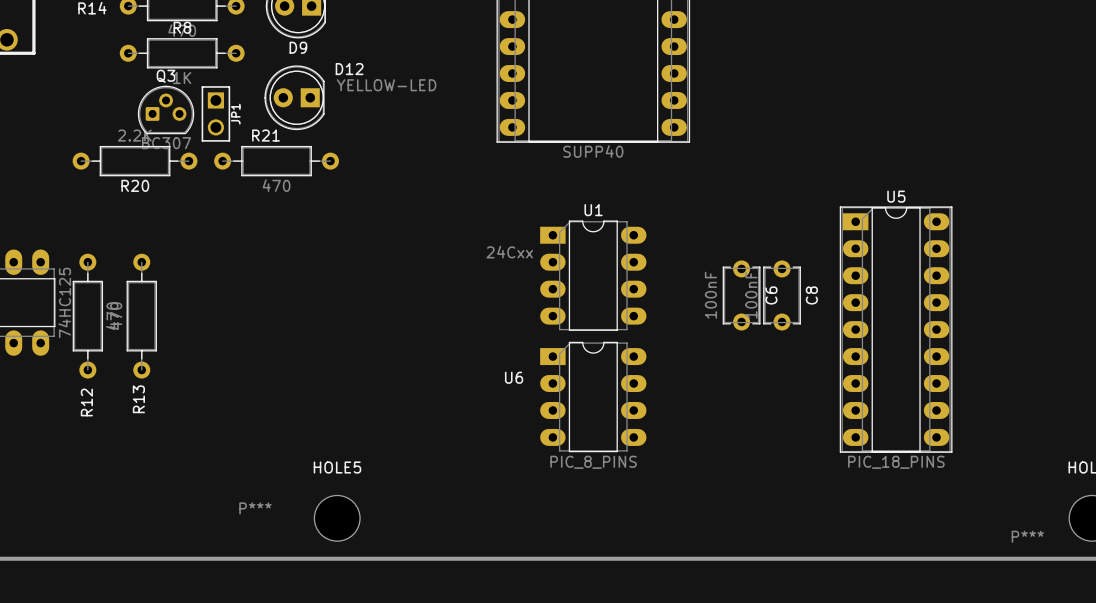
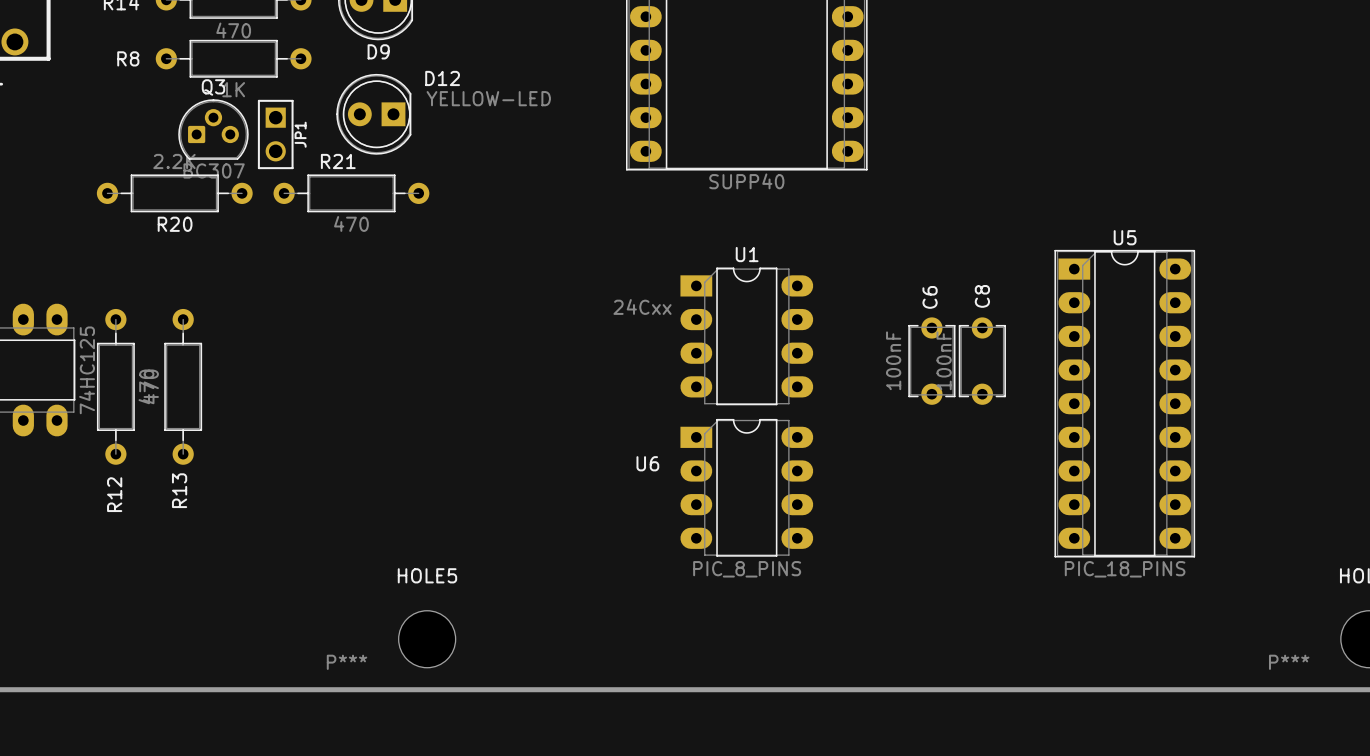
R8 name position: R8 (182, 27) -> R8 (128, 58)
C6 name position: C6 (771, 295) -> C6 (930, 297)
C8 name position: C8 (811, 295) -> C8 (982, 296)
HOLE5 value position: P*** (255, 508) -> P*** (347, 662)

